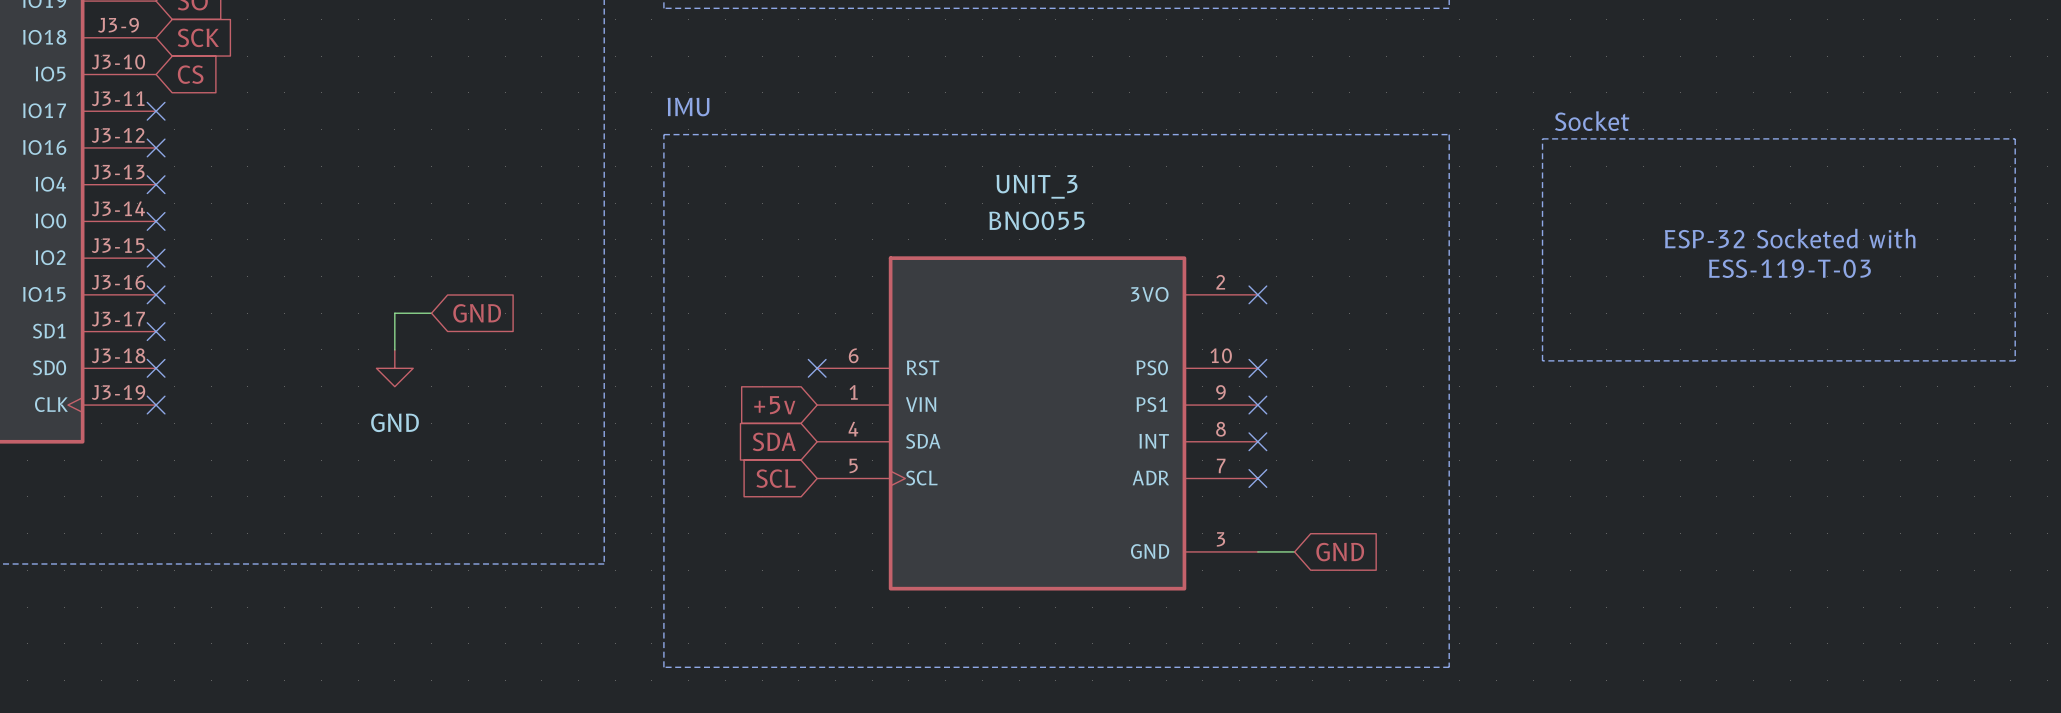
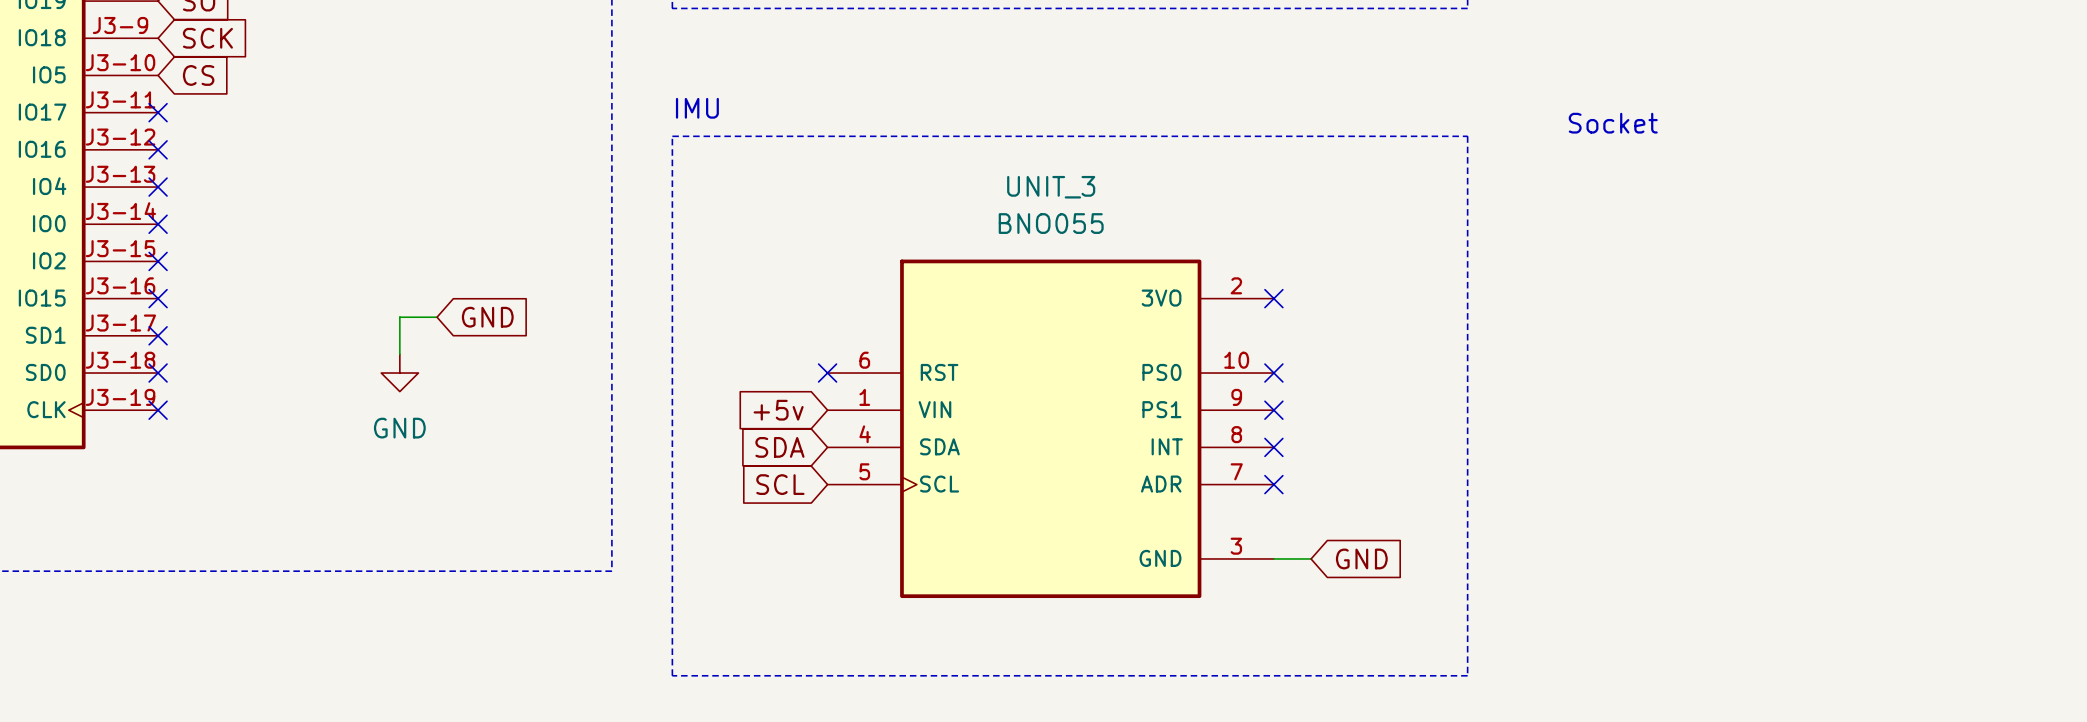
line: (1542, 138) (2015, 138) (2015, 360) (1542, 360) (1542, 138) -> none
text: ESP-32 Socketed with (1790, 238) -> none
text: ESS-119-T-03 (1789, 268) -> none

